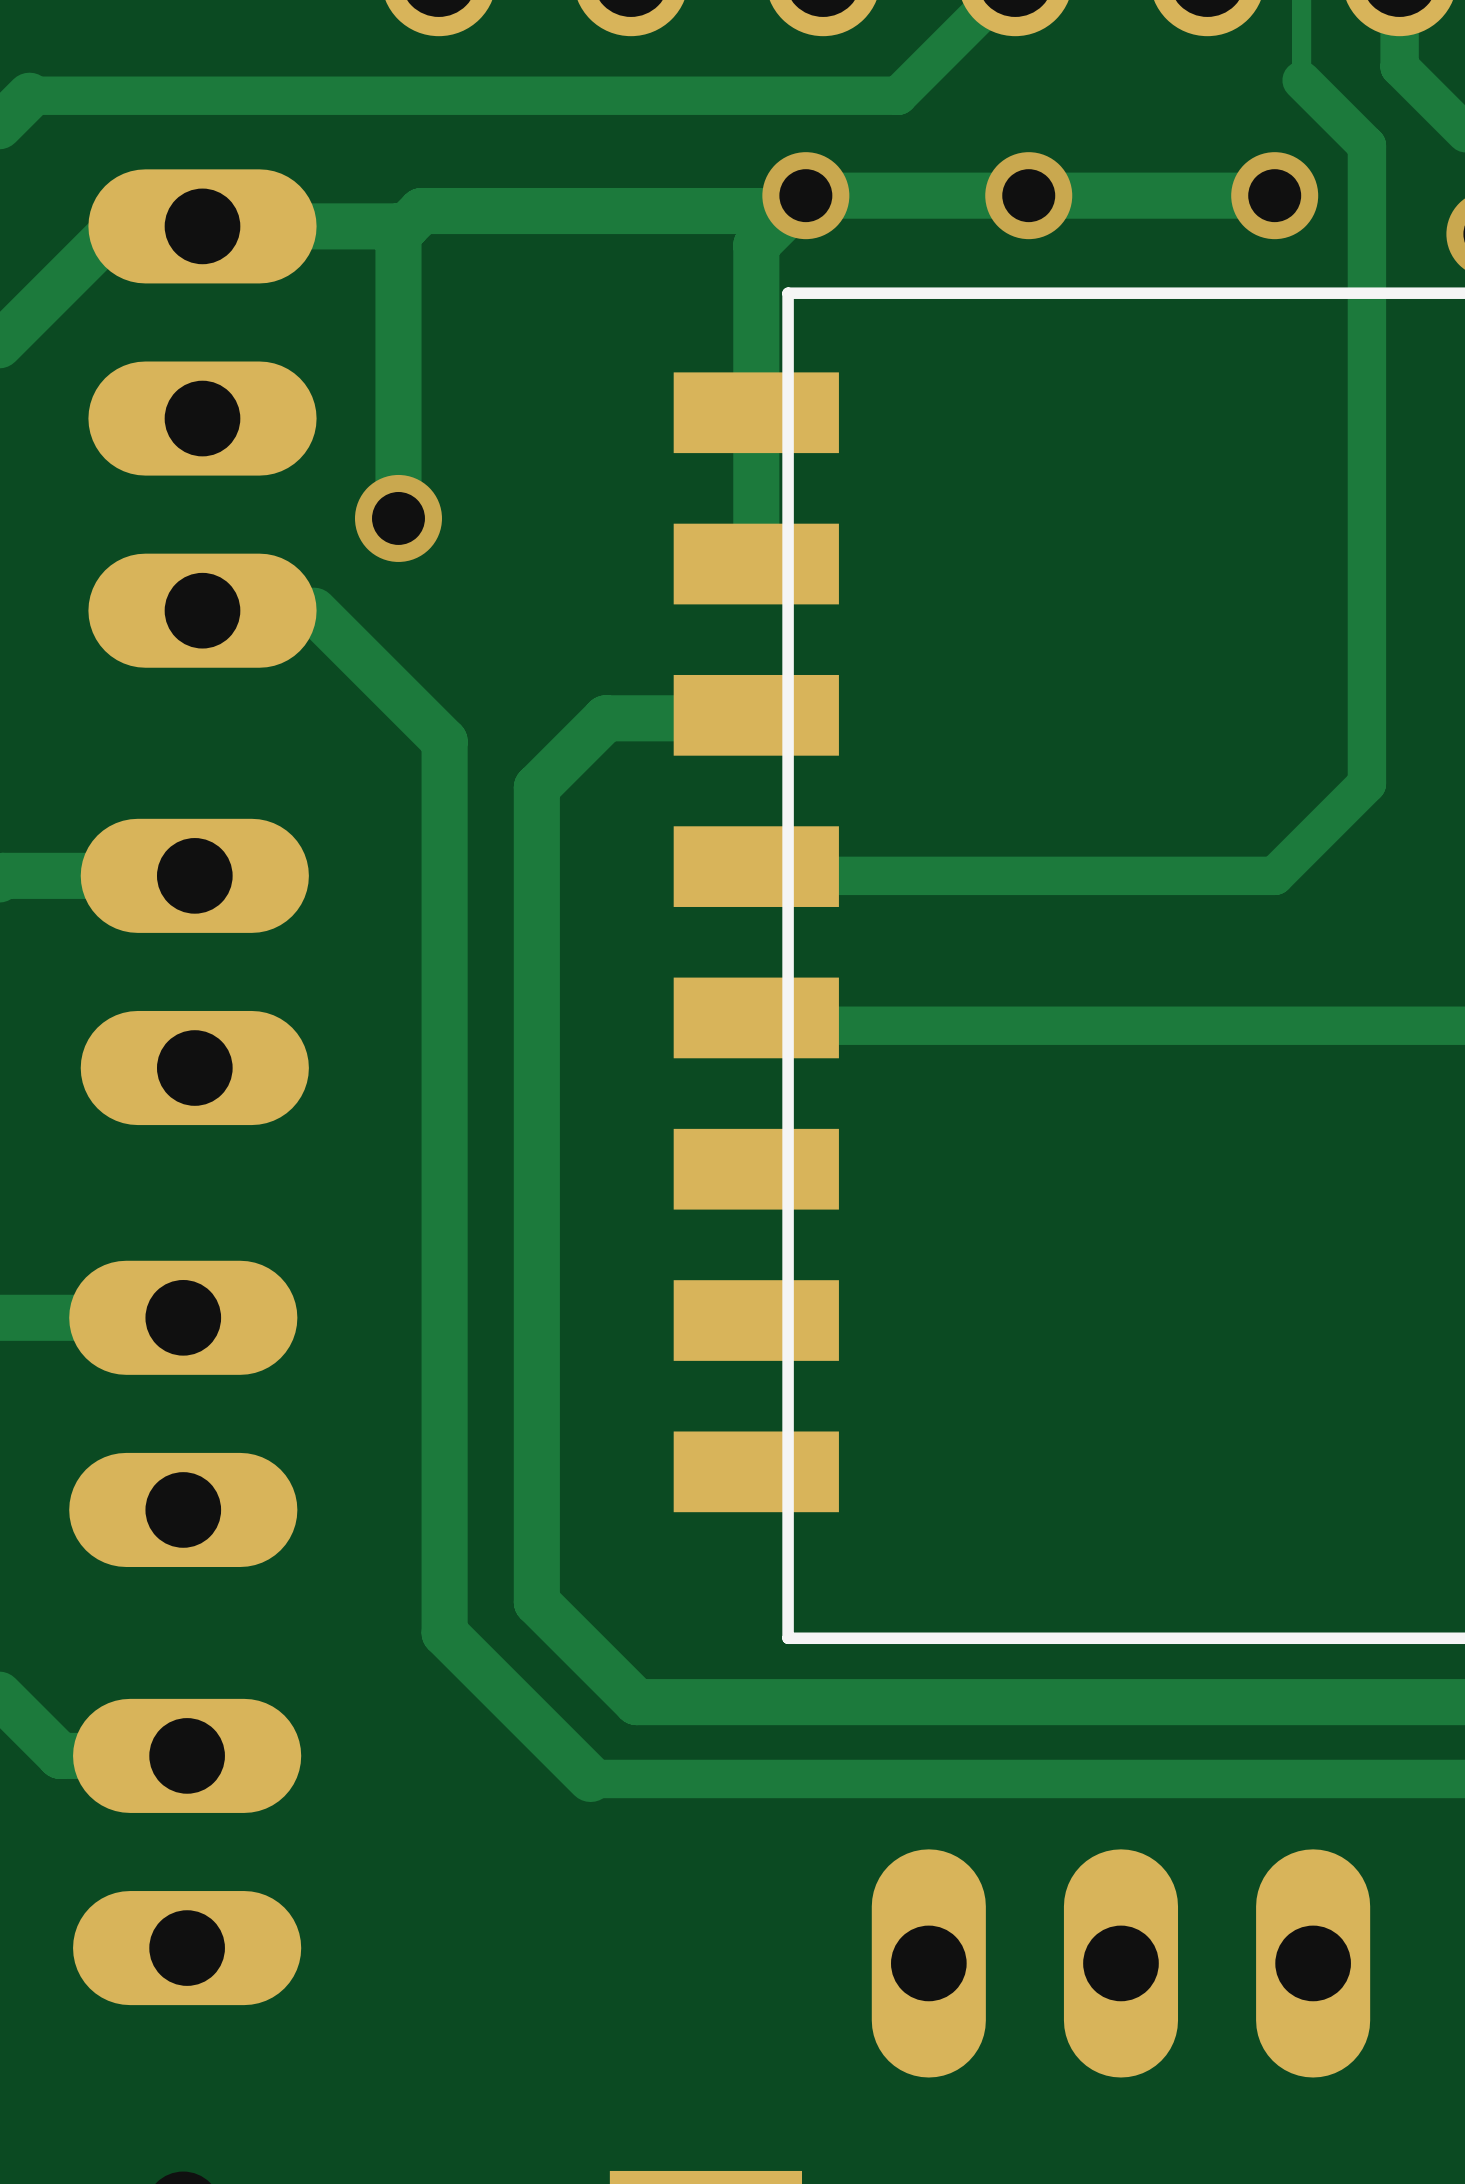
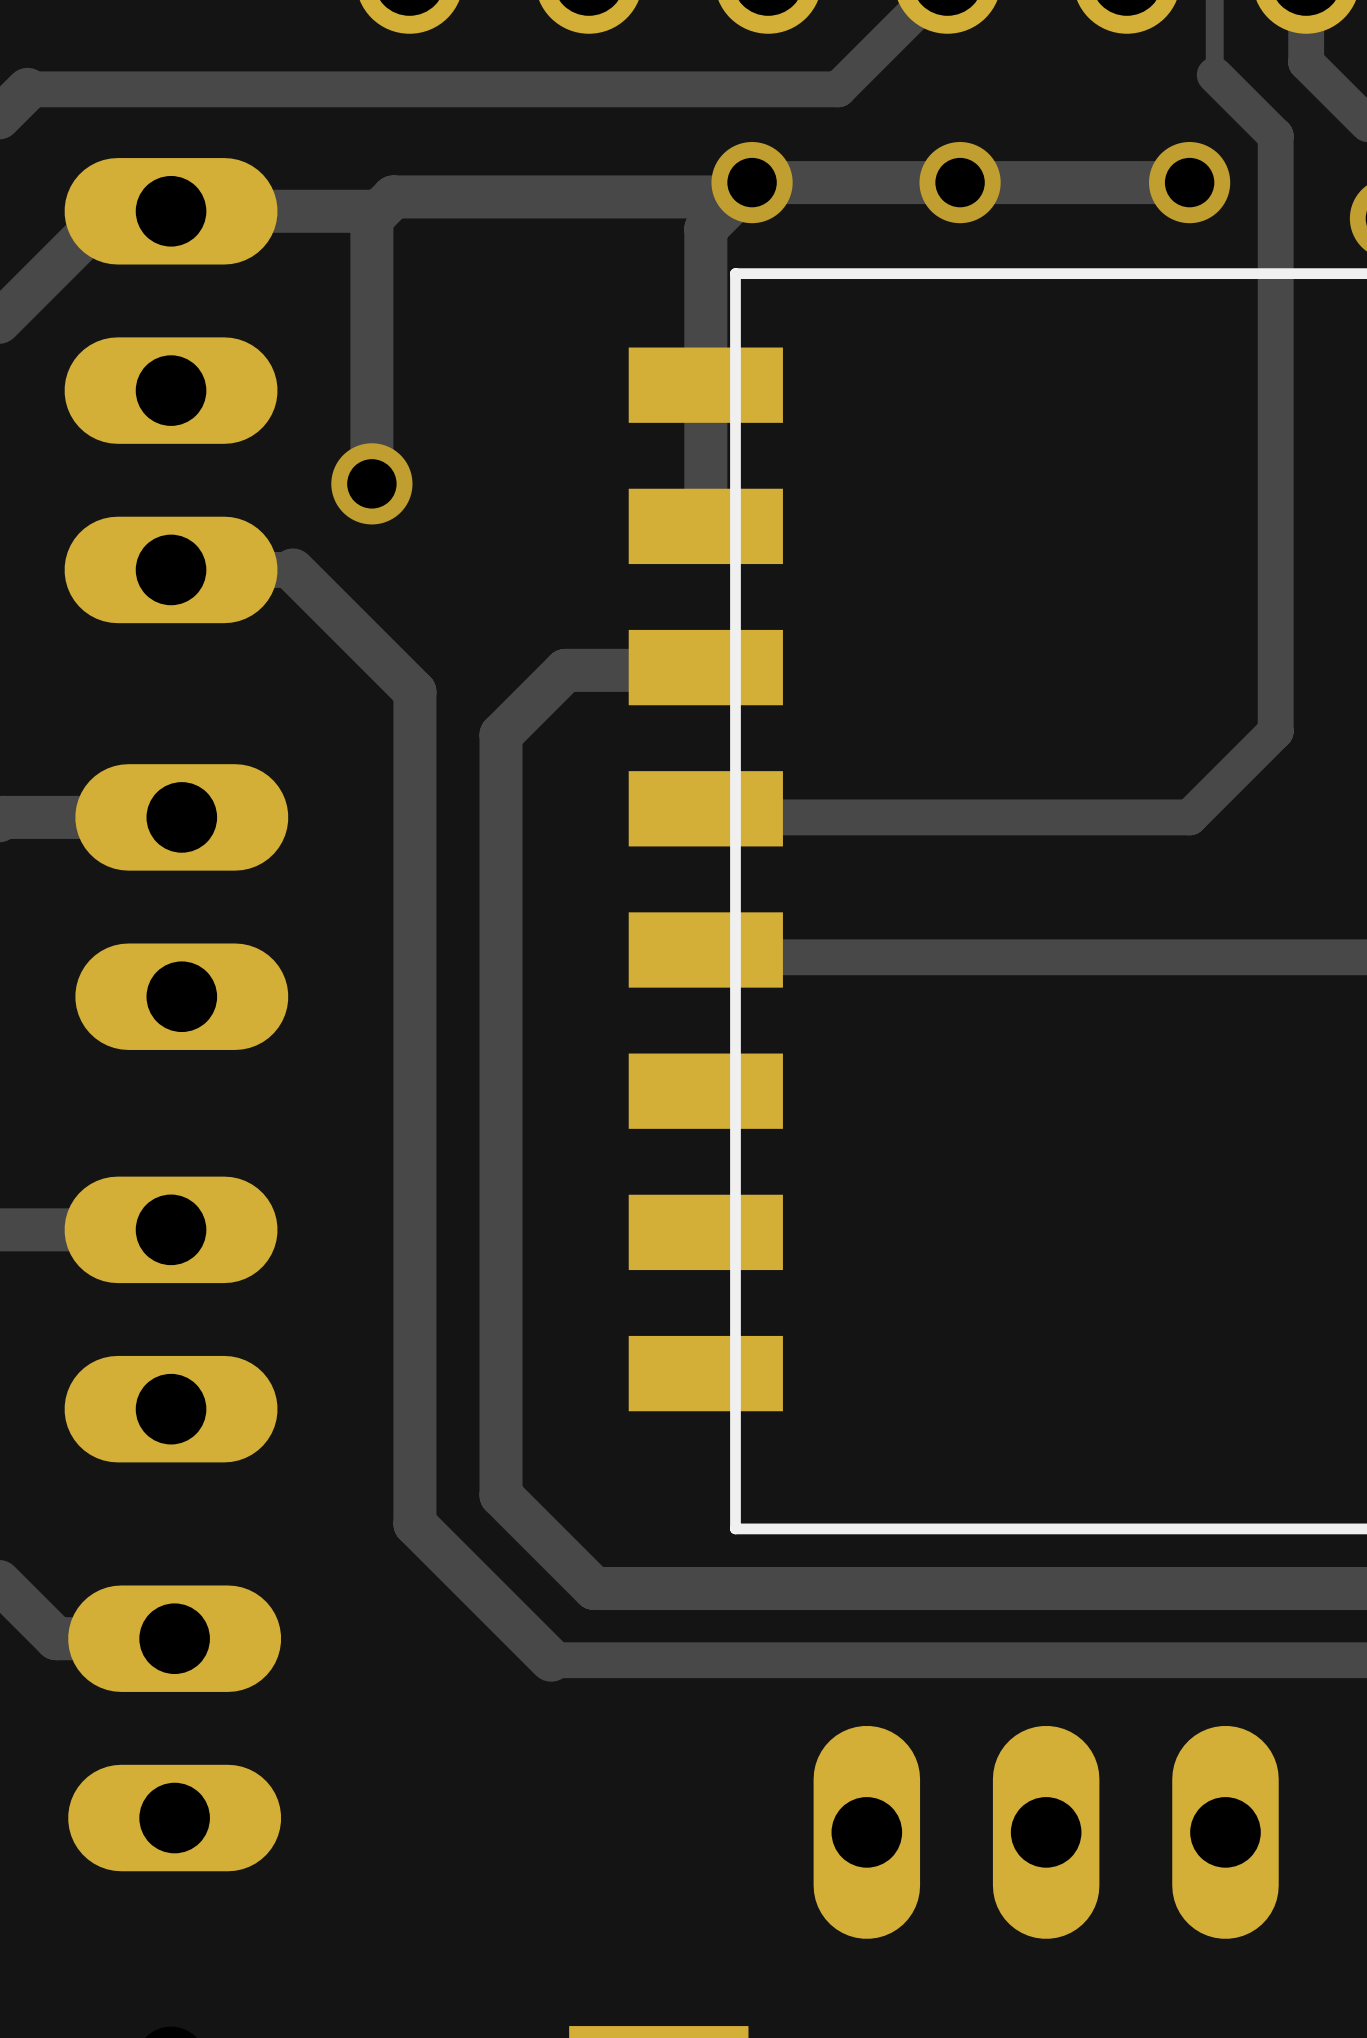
part position: (202, 418) -> (171, 390)

